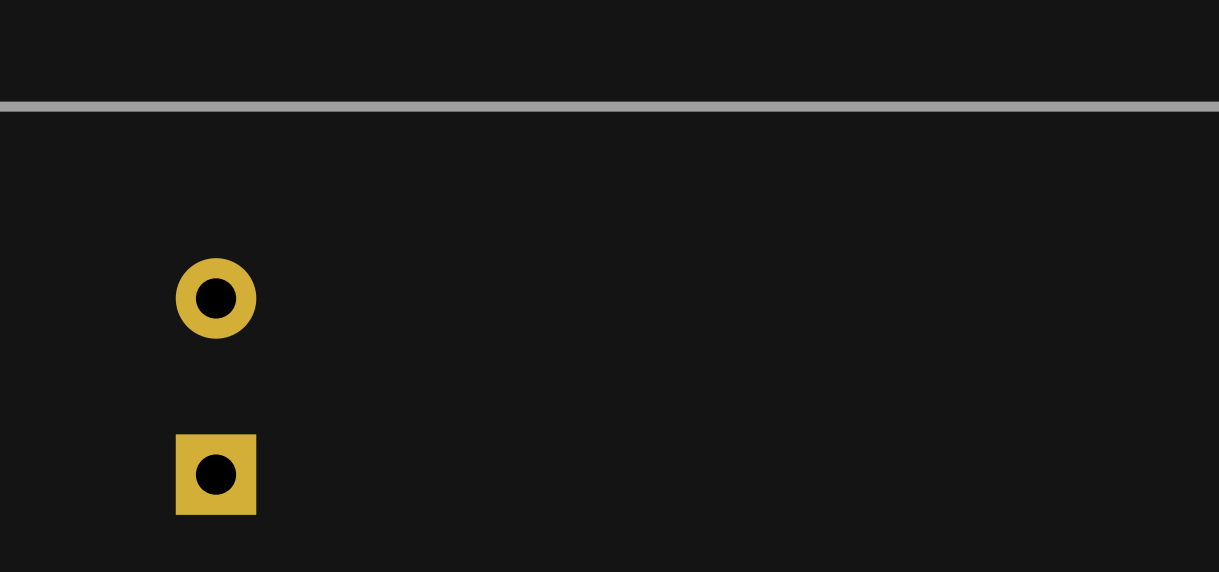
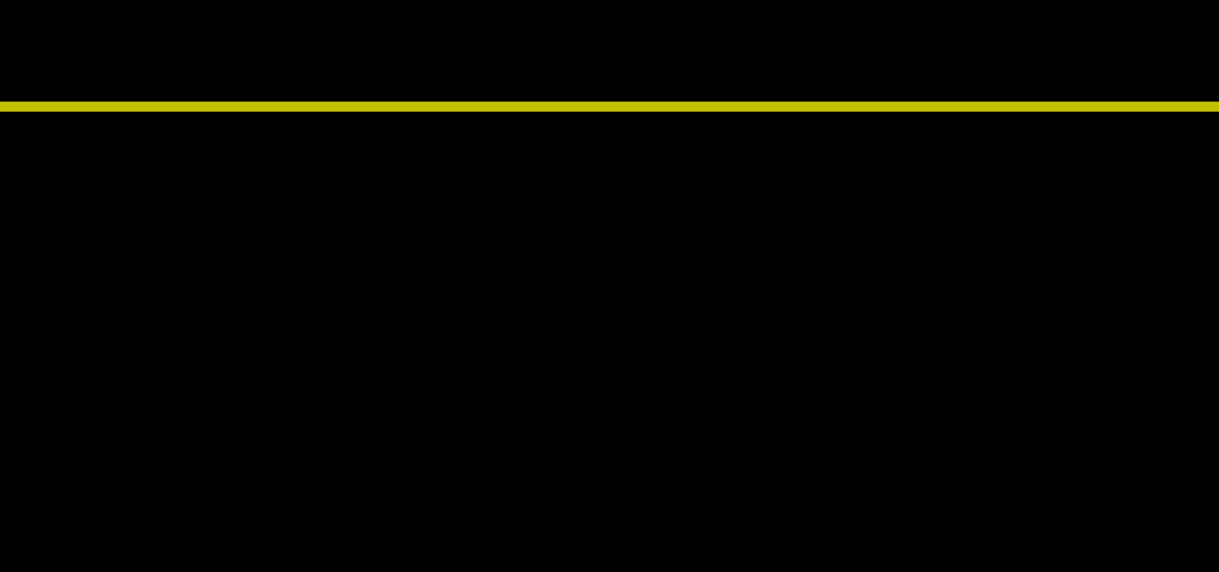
part: (216, 386) -> none

